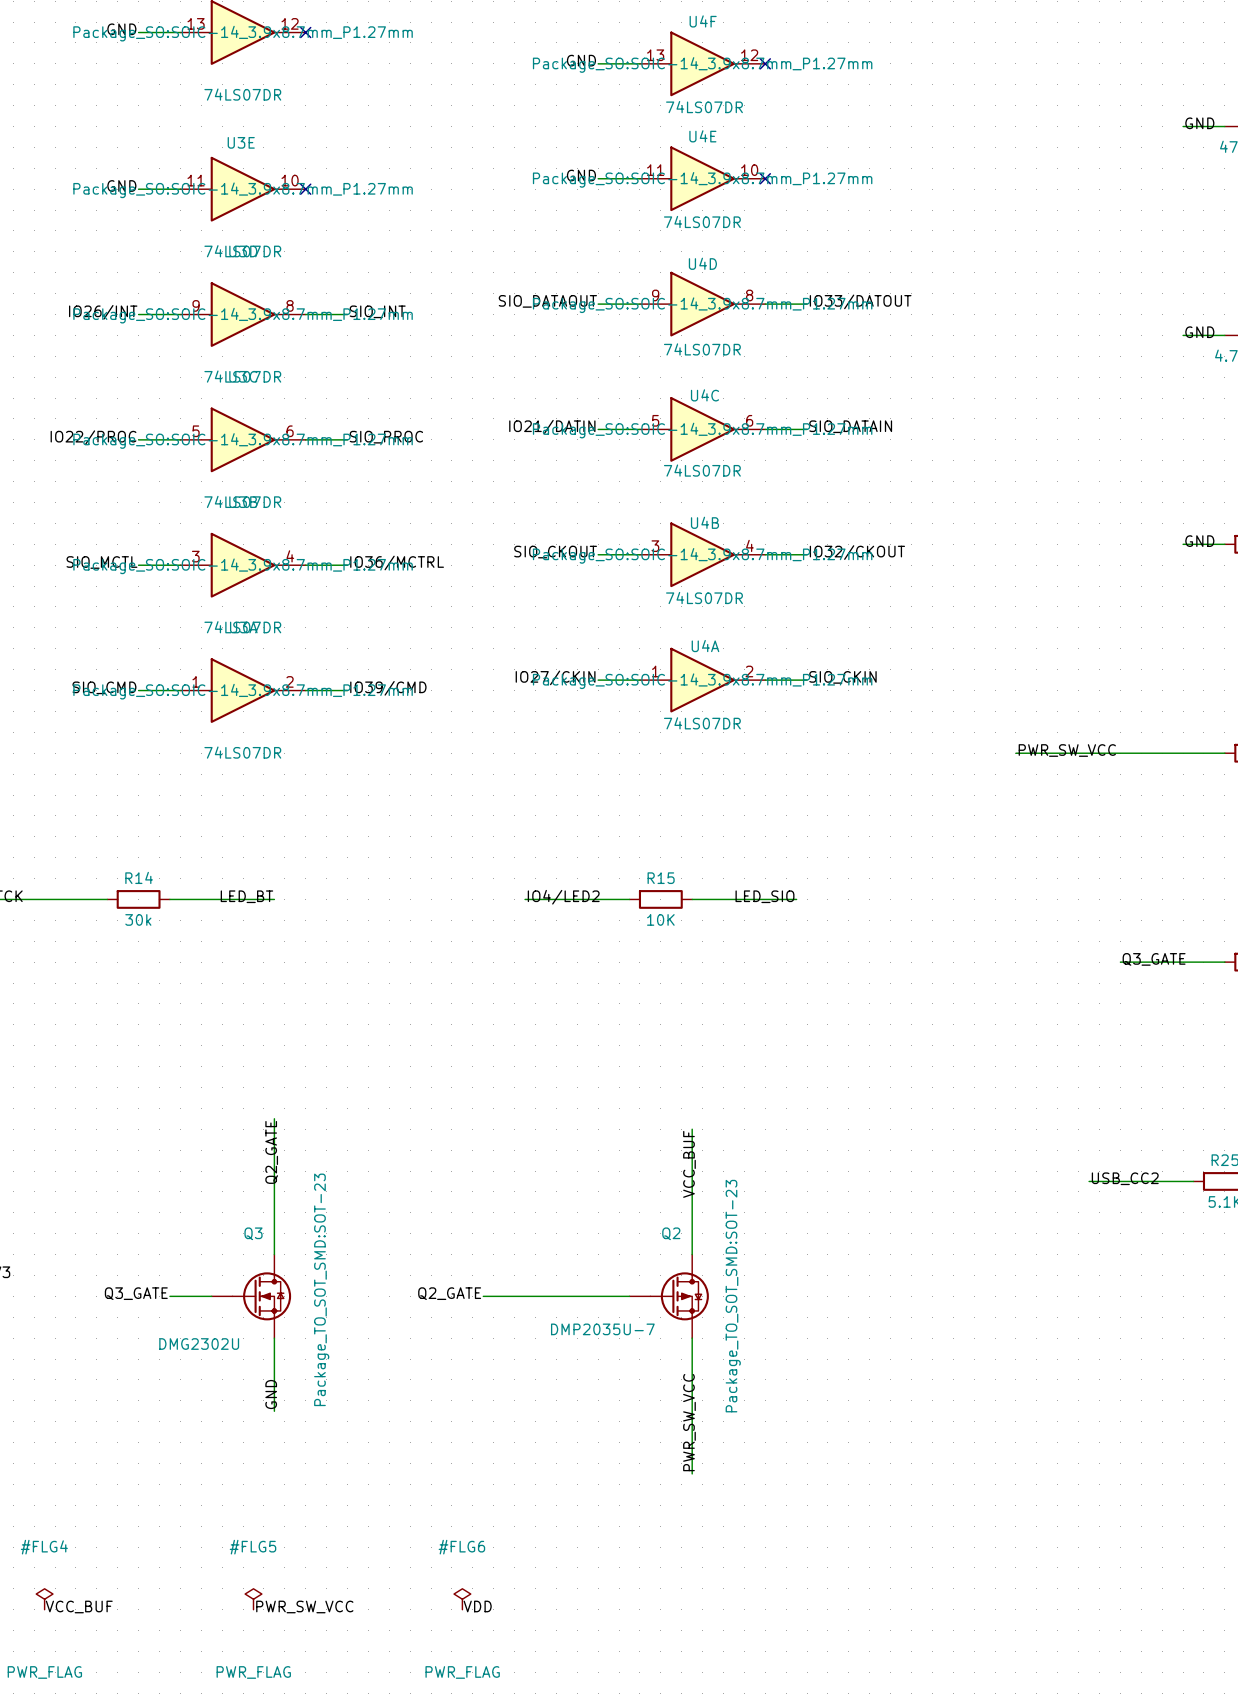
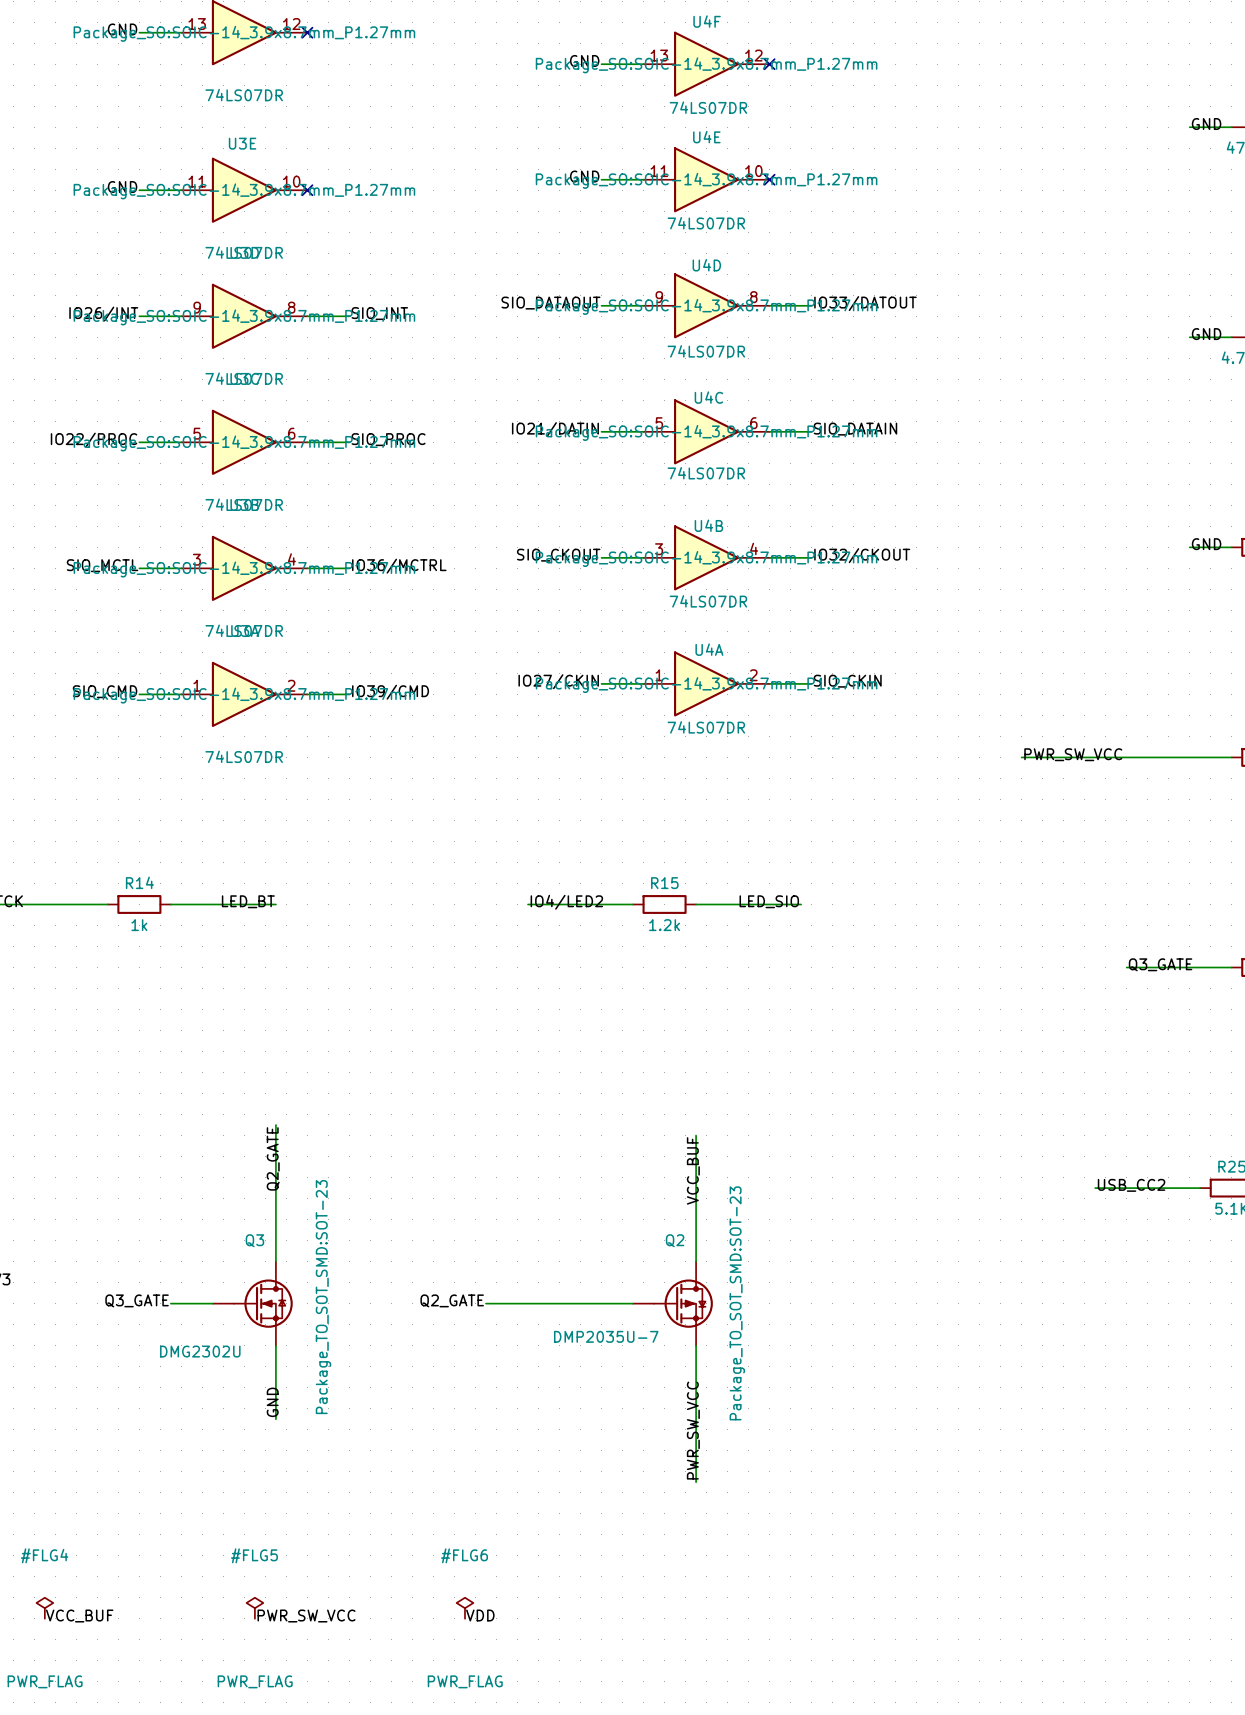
R14 value: 30k (138, 919) -> 1k (139, 925)
R15 value: 10K (660, 919) -> 1.2k (664, 925)

